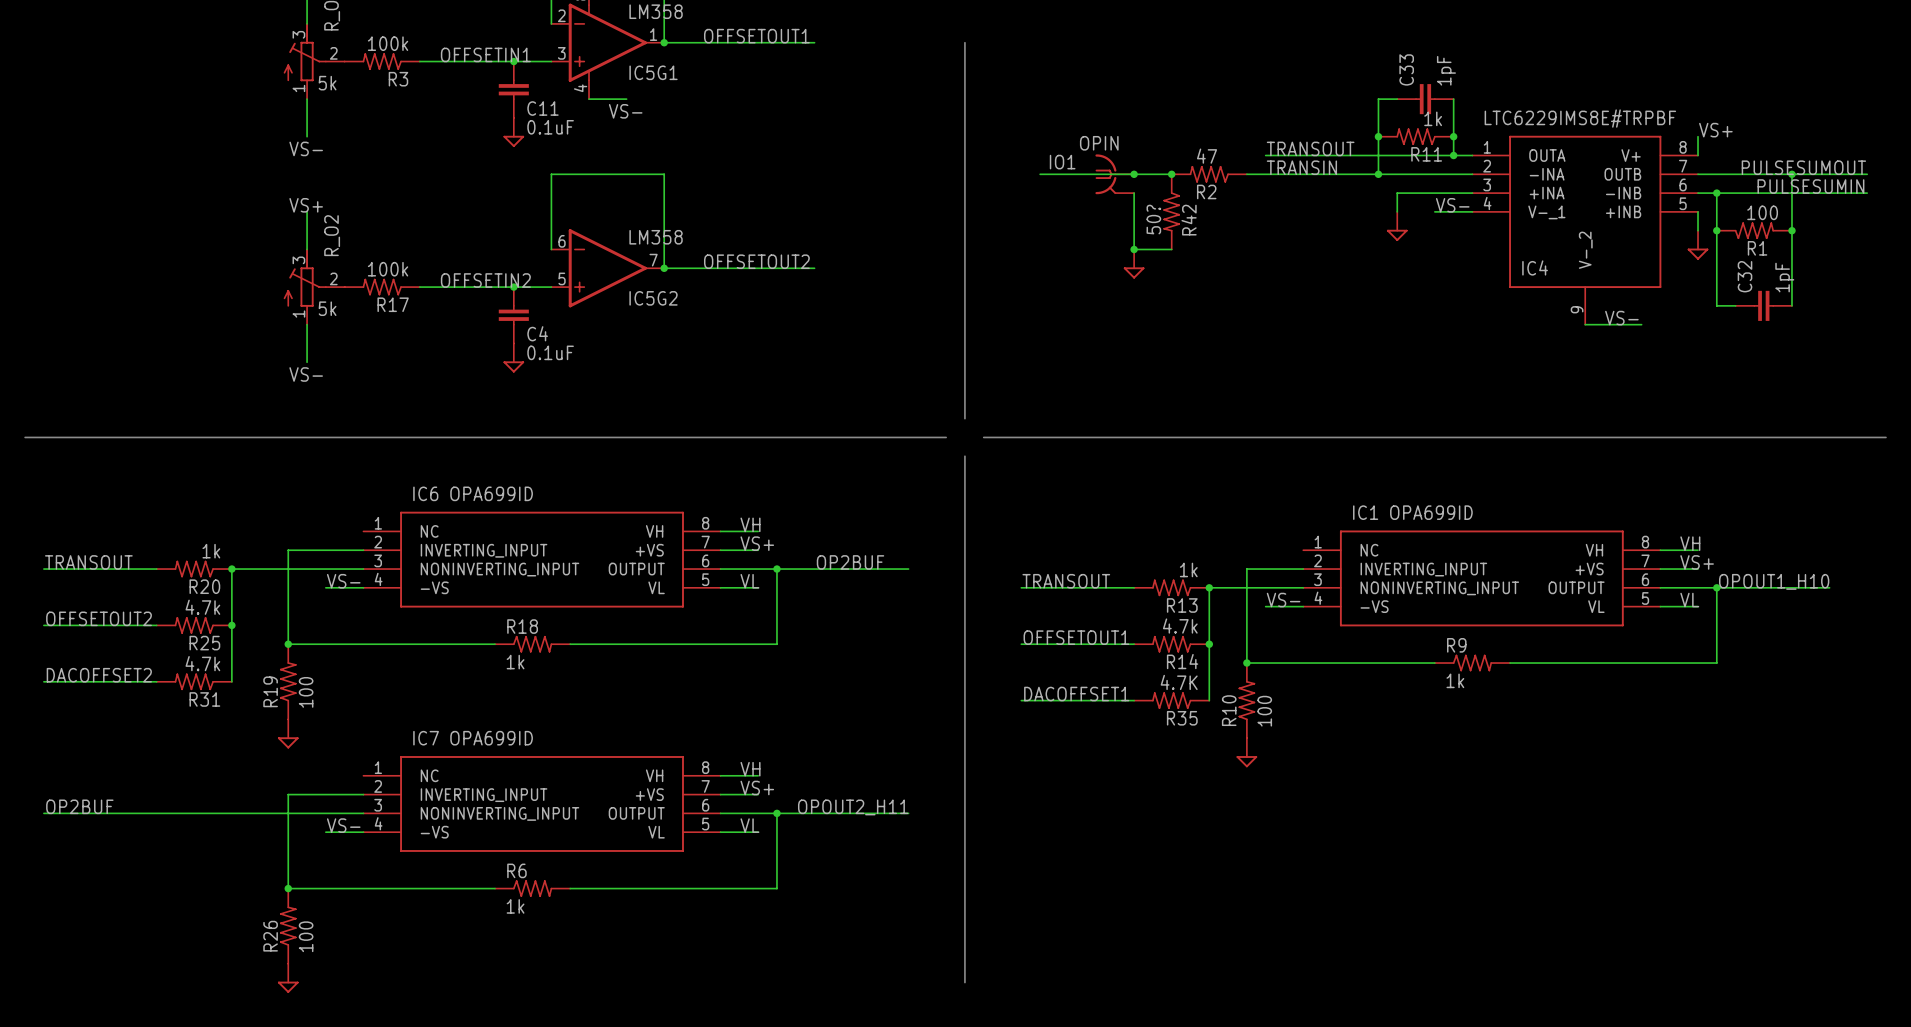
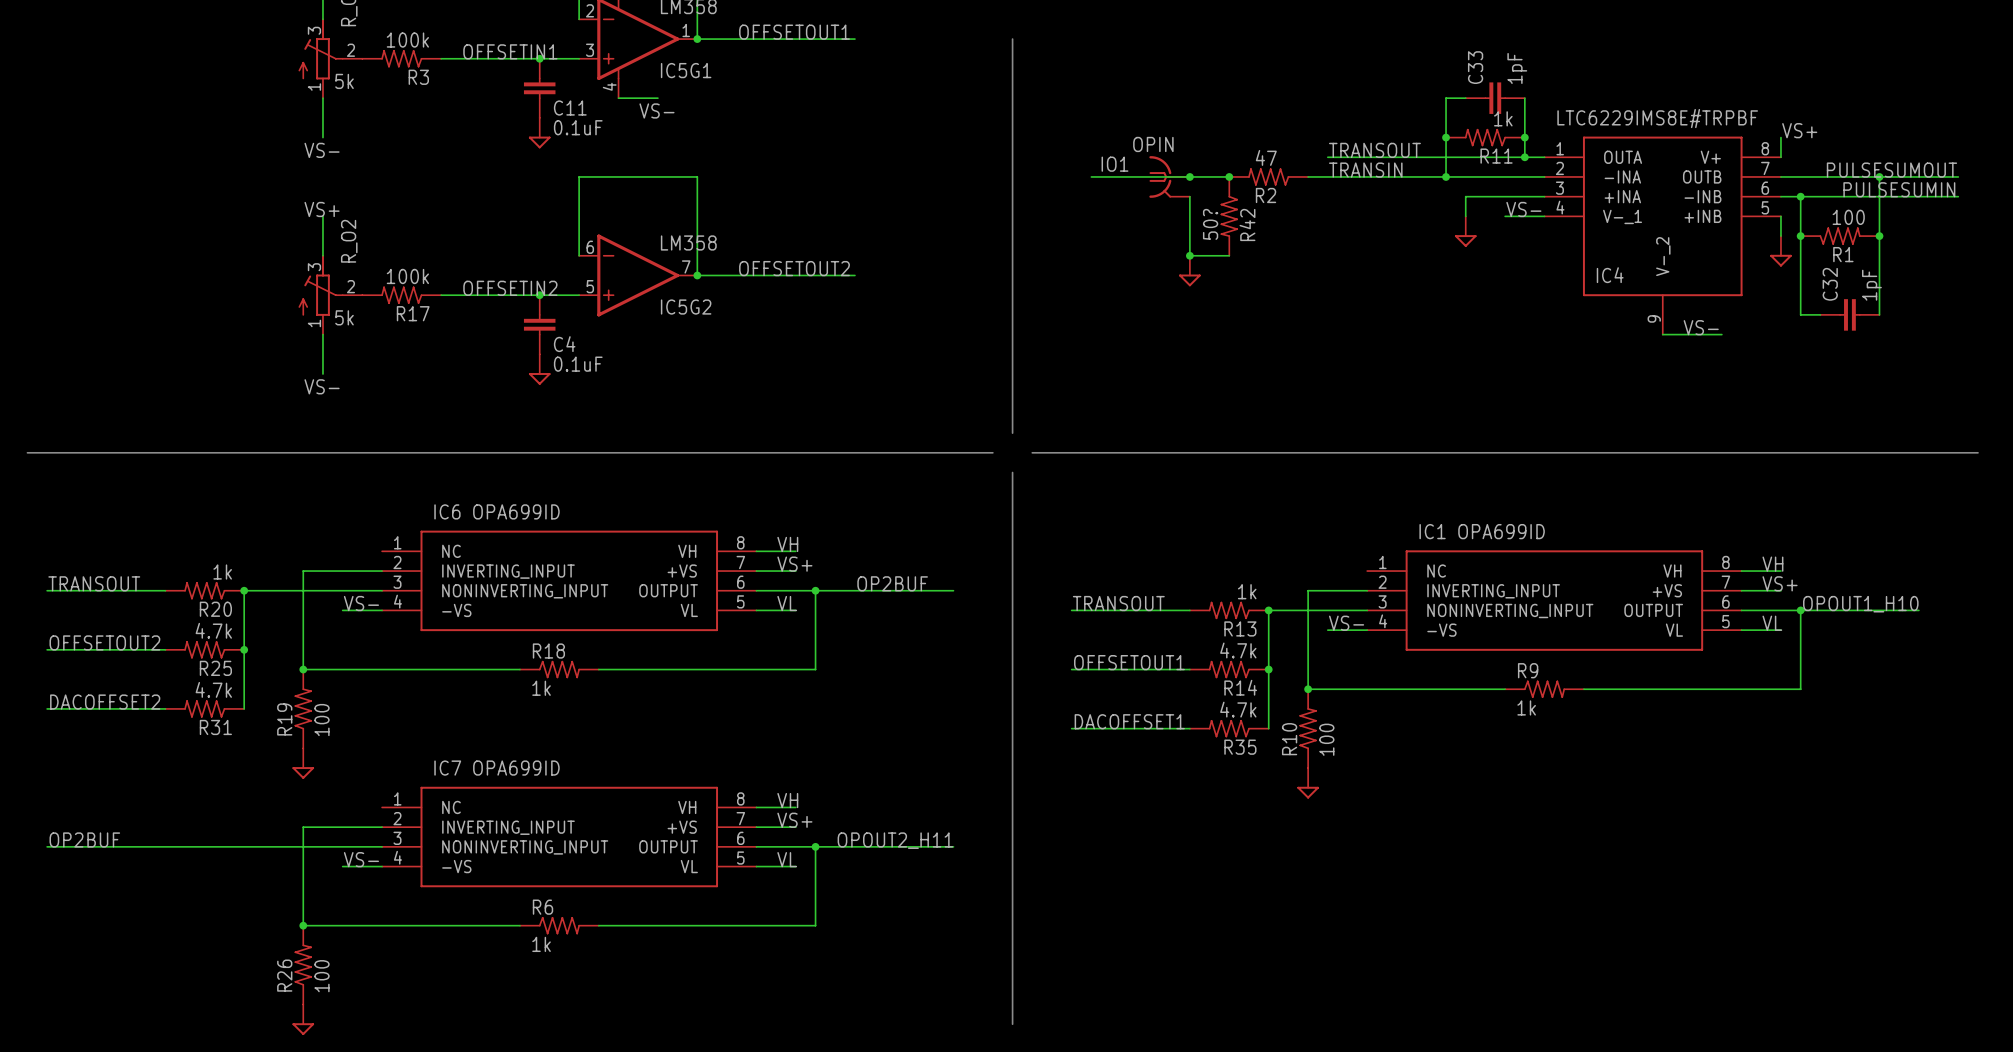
R35 value: 4.7K (1179, 682) -> 4.7k (1238, 709)

